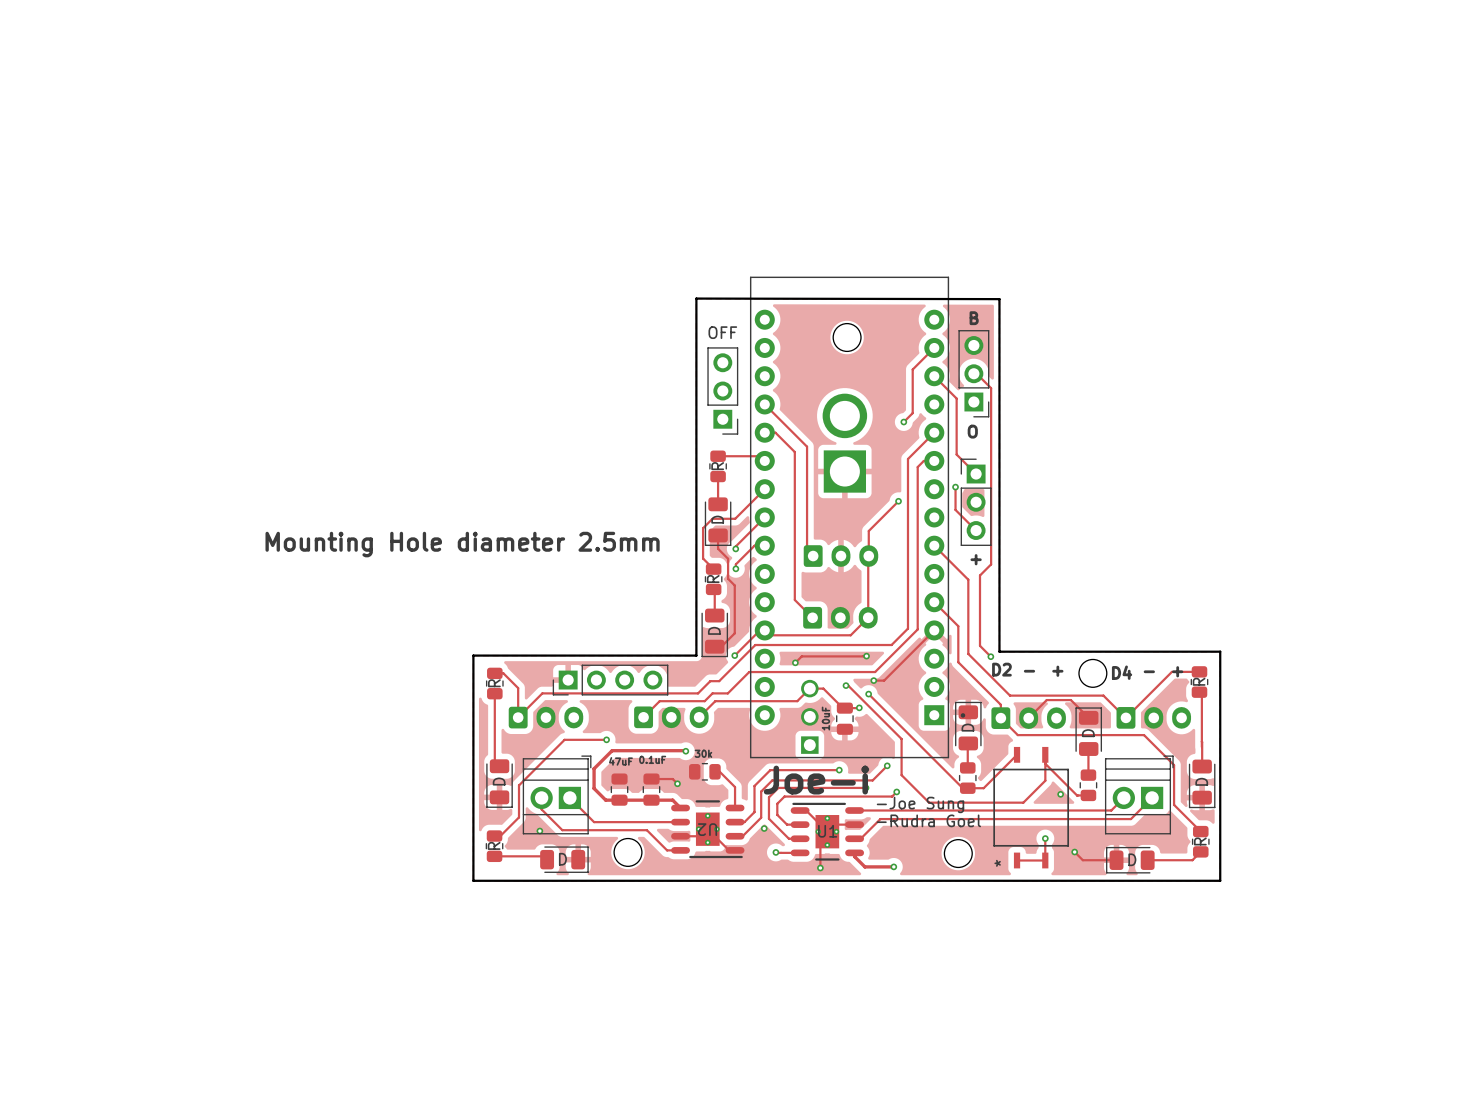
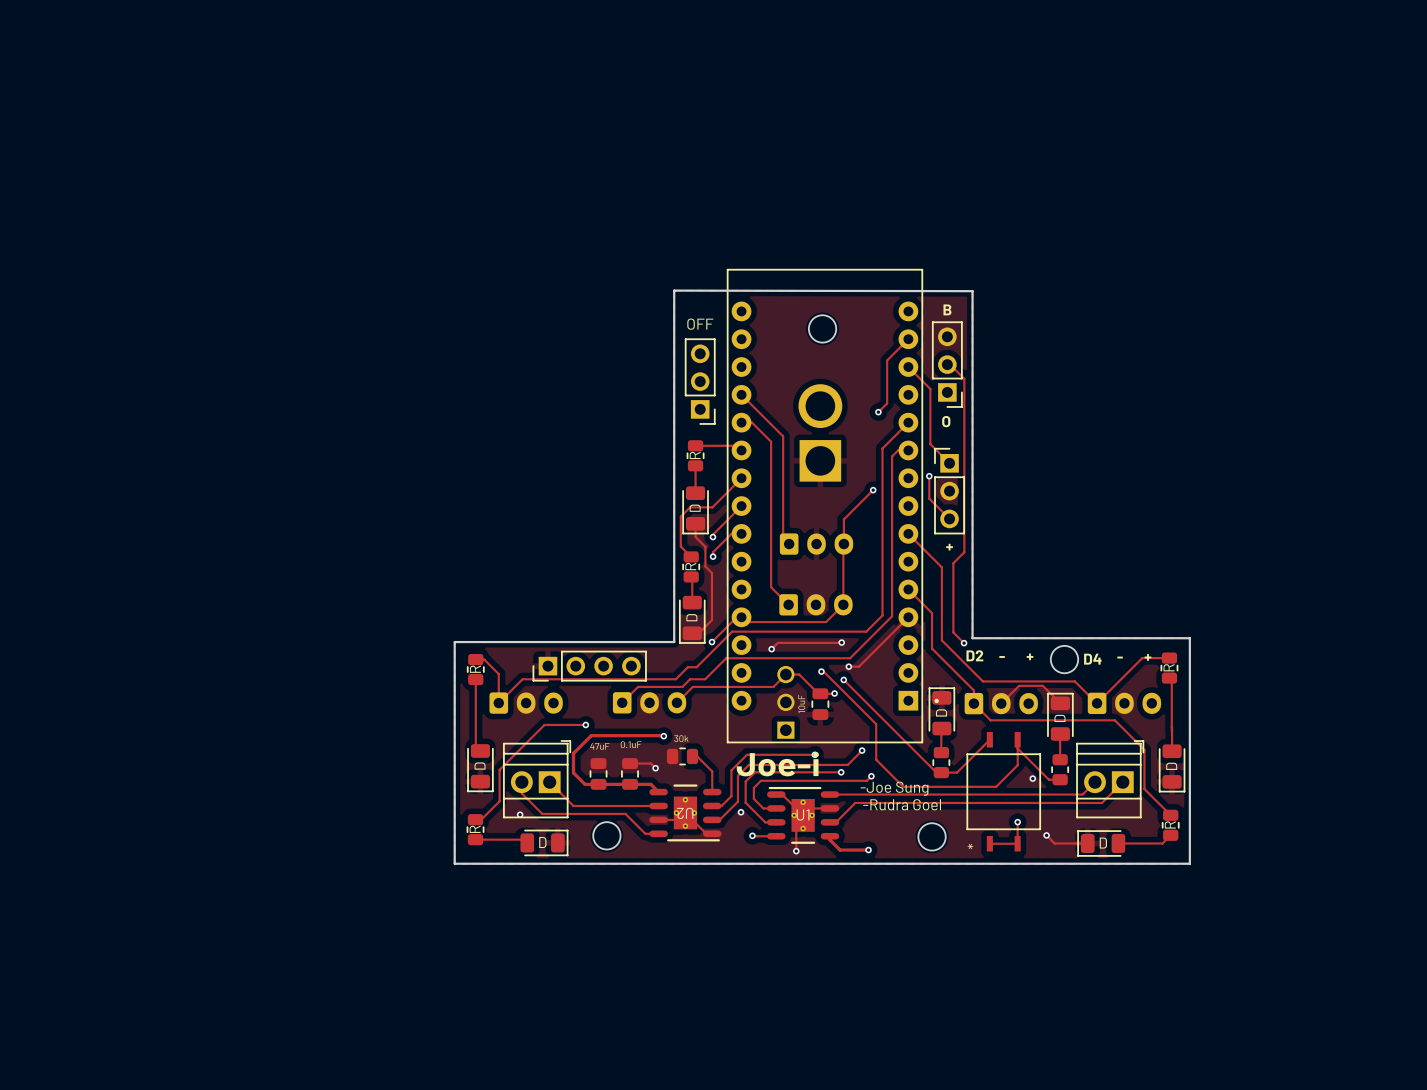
text: Mounting Hole diameter 2.5mm (462, 544) -> none

